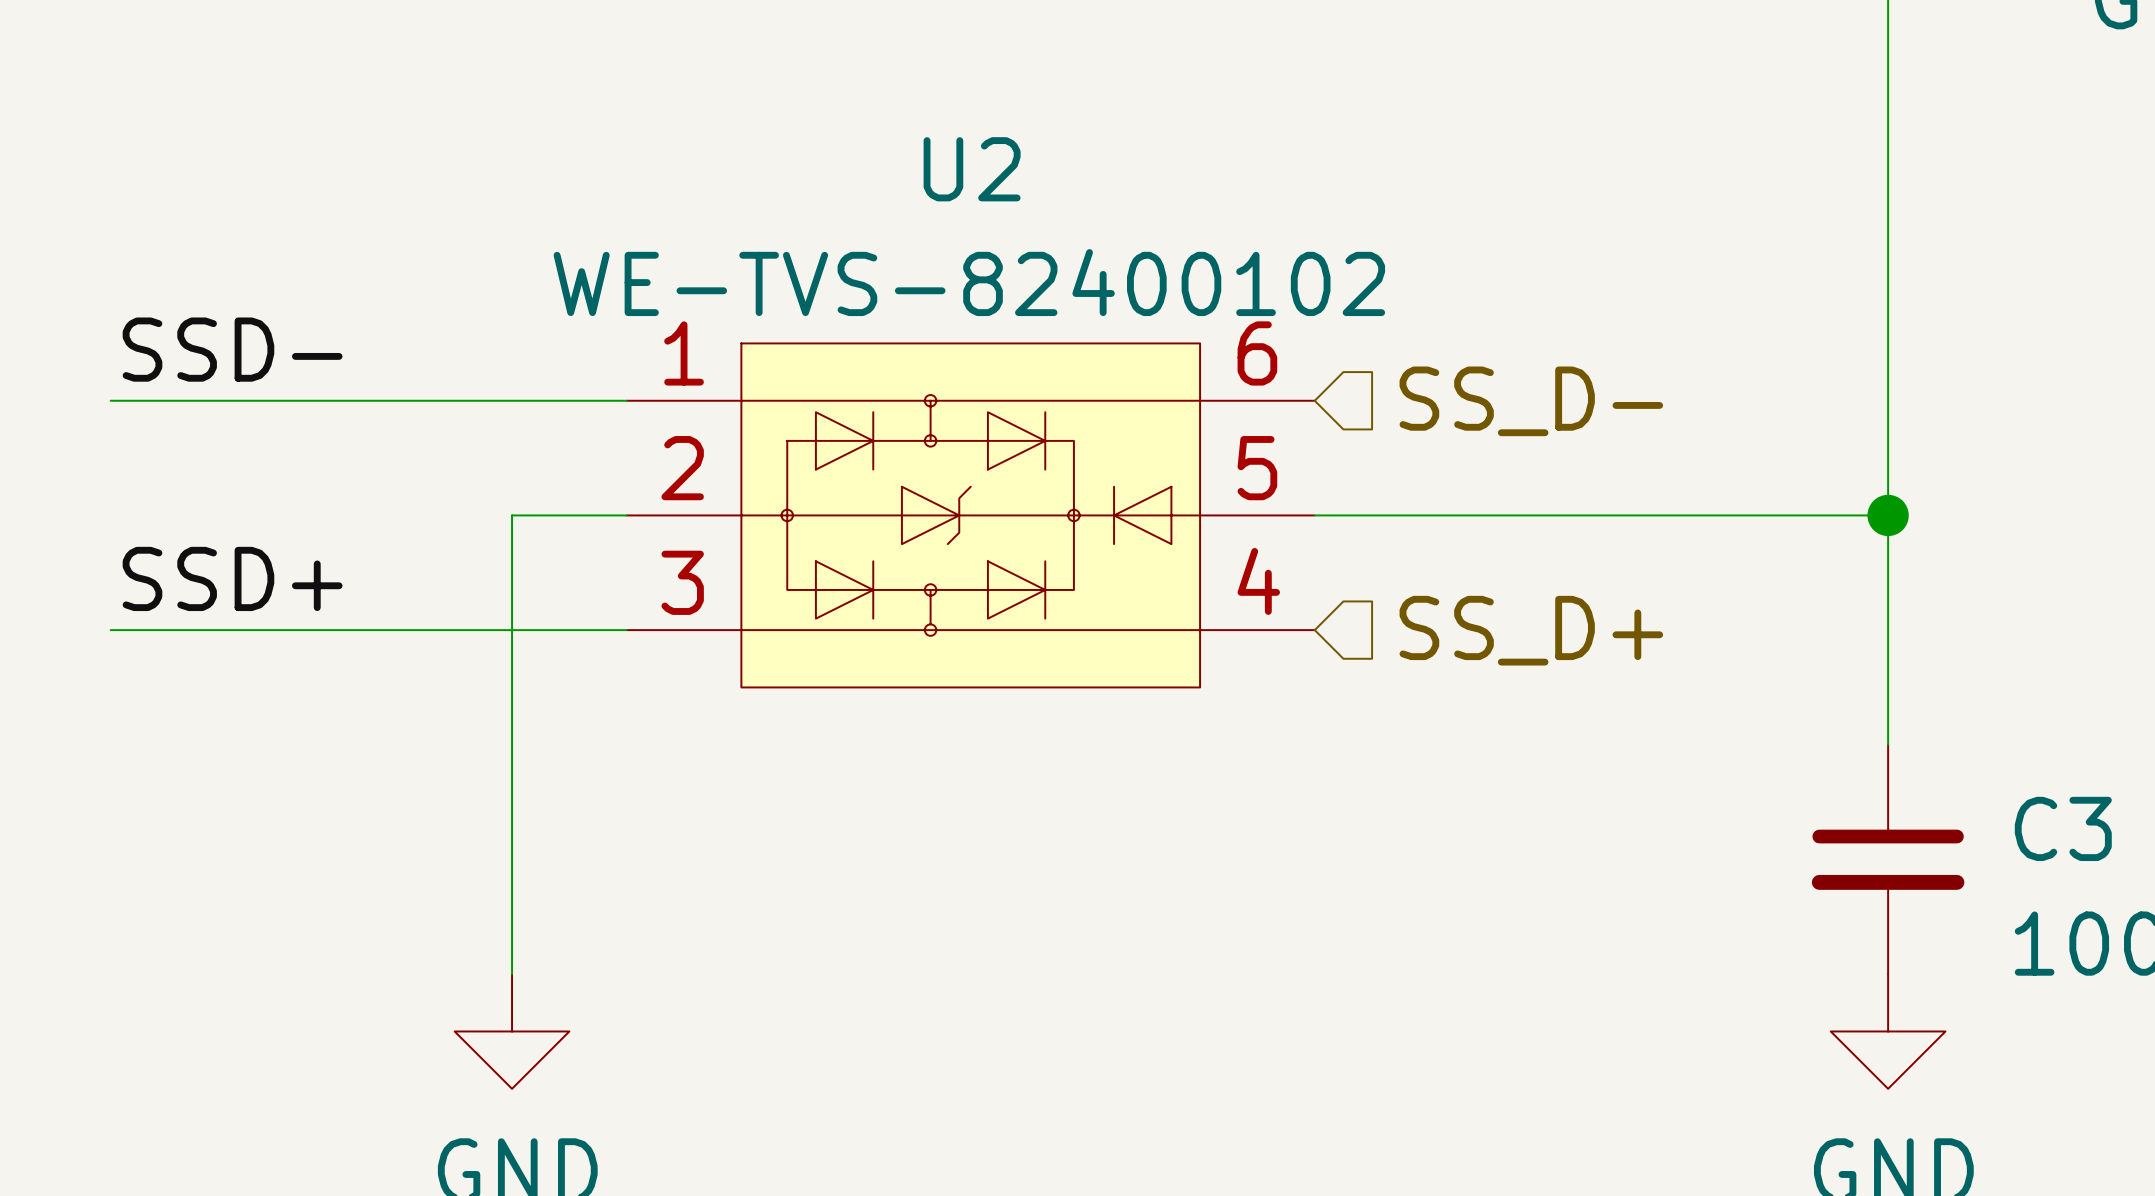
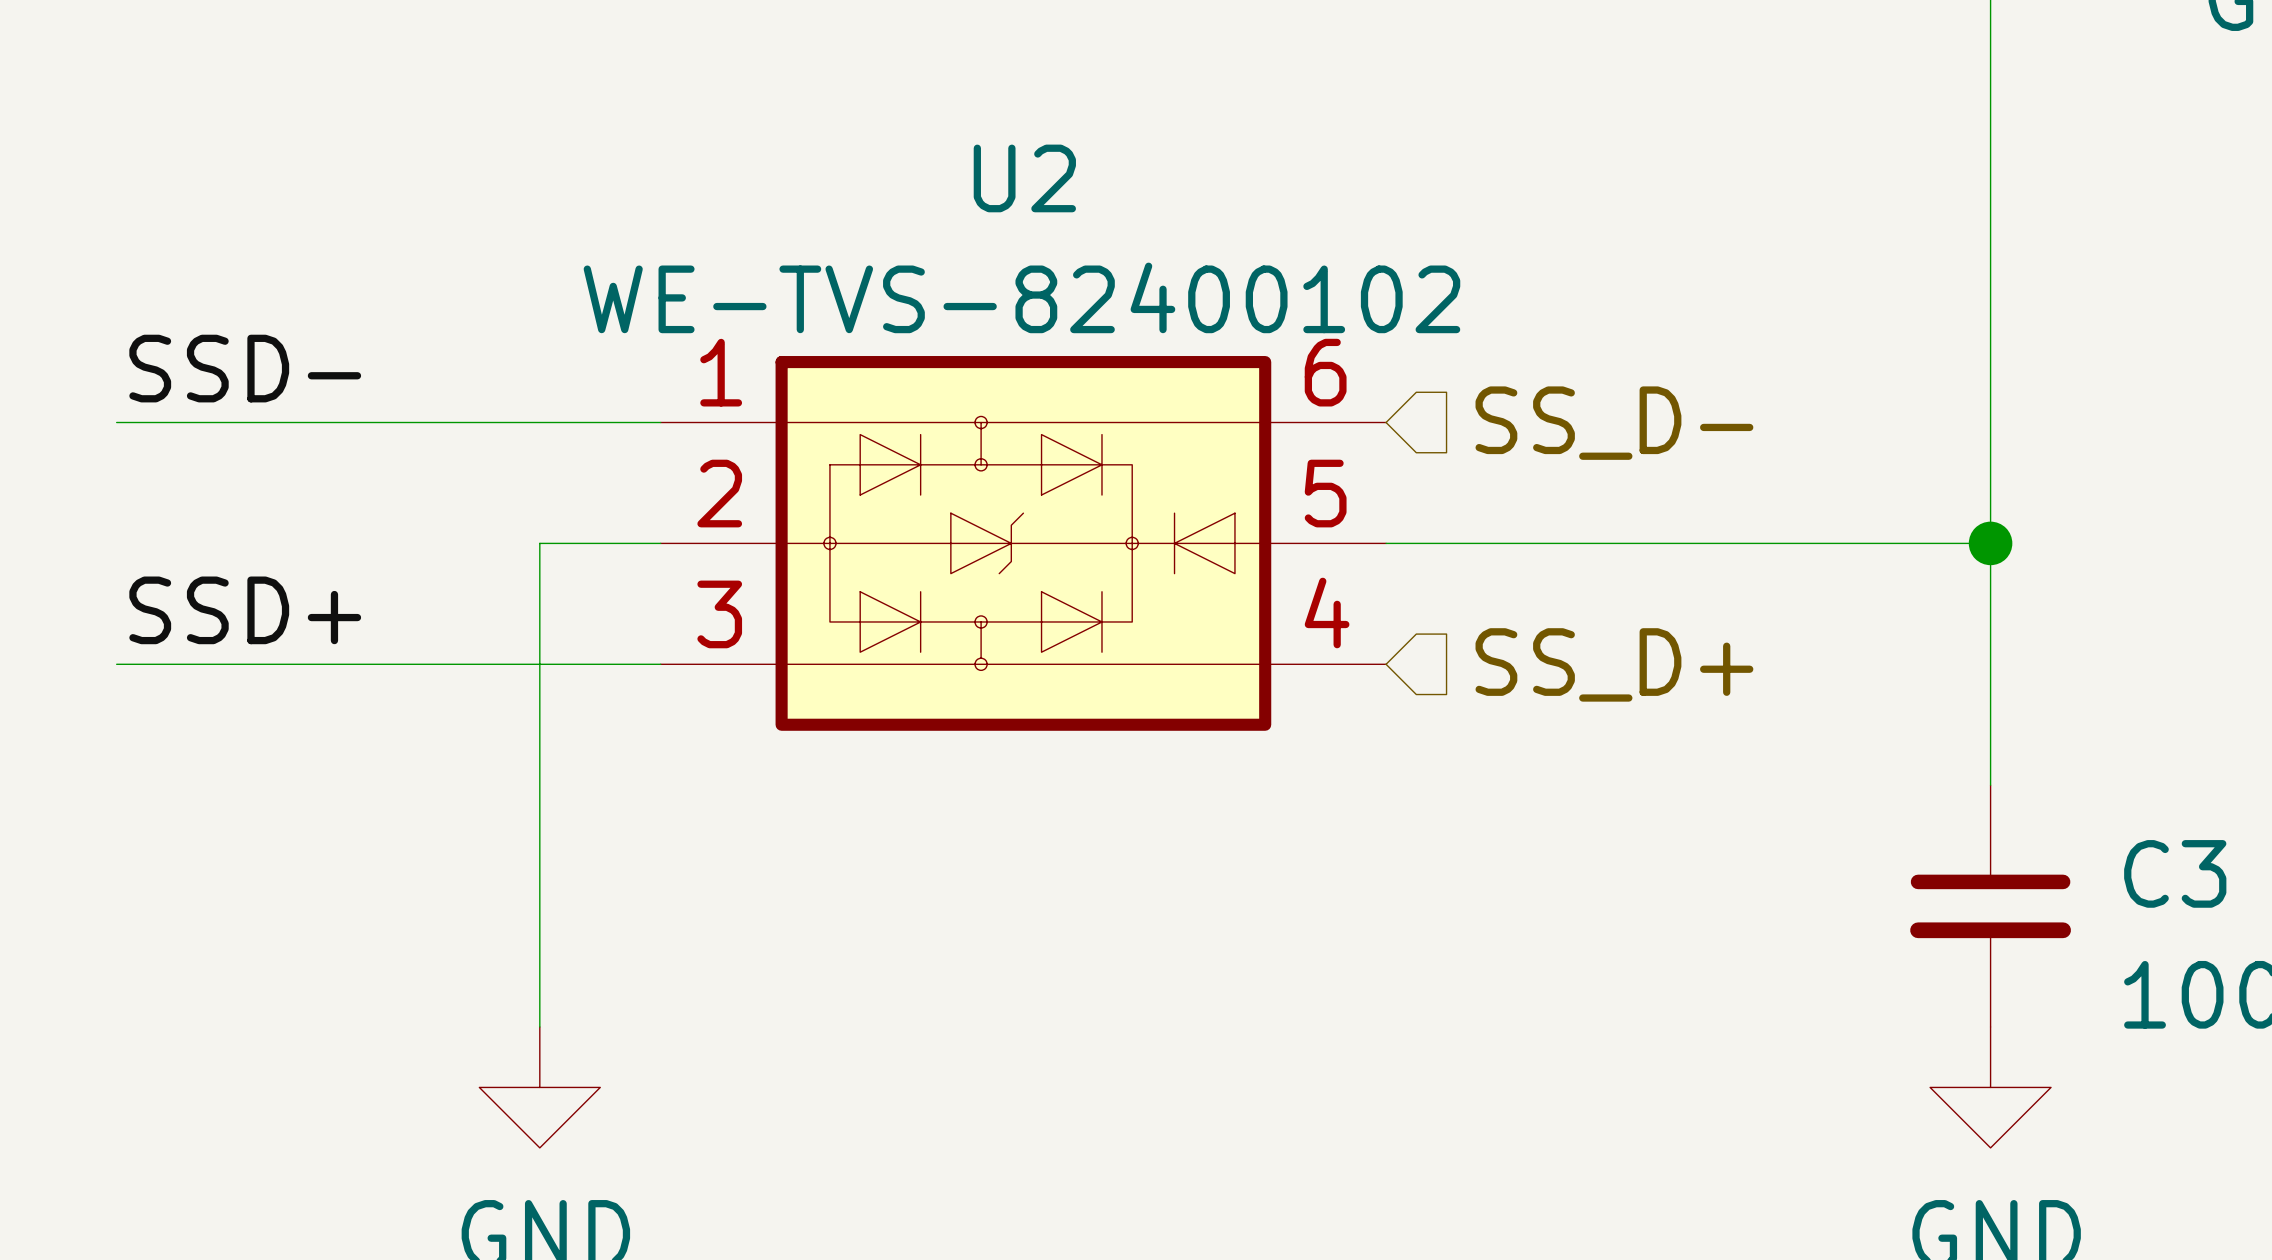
U2 symbol: [626, 343, 1315, 688] -> [660, 356, 1387, 731]

